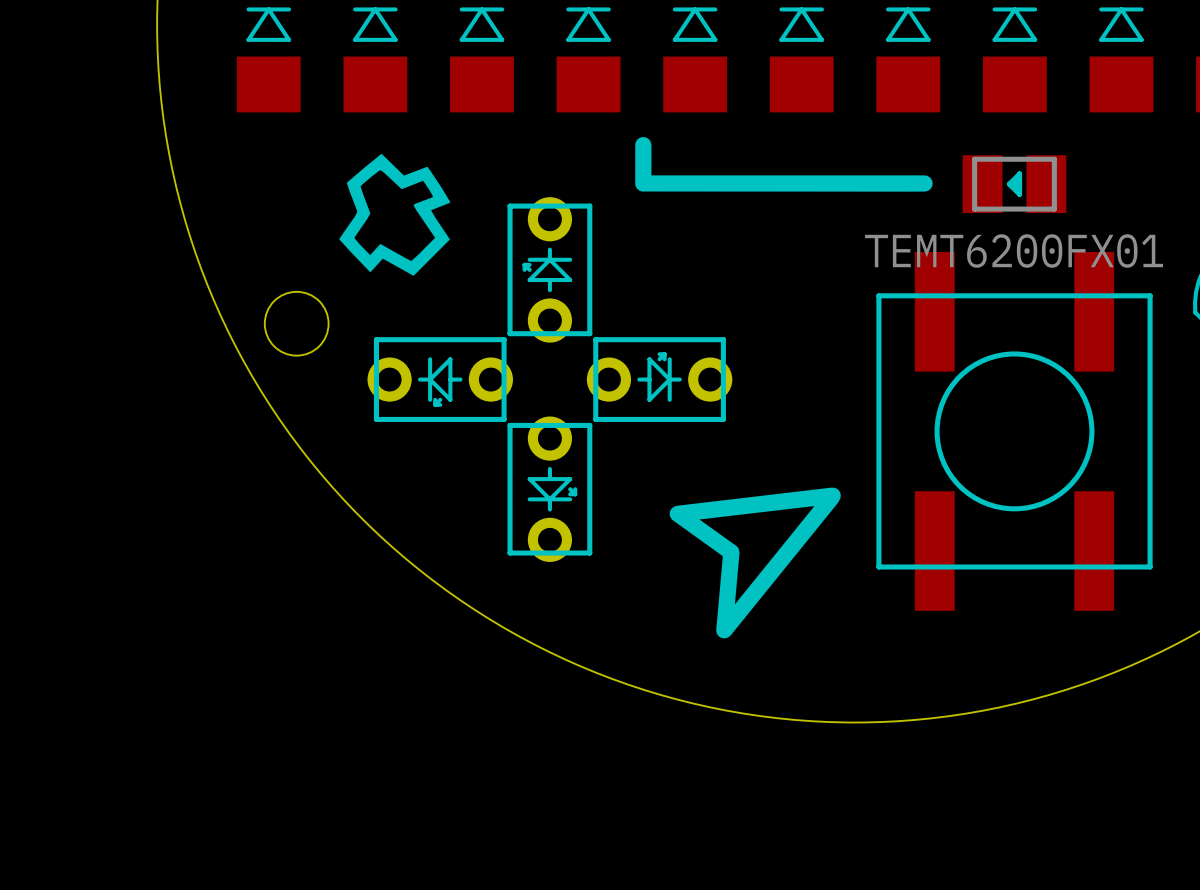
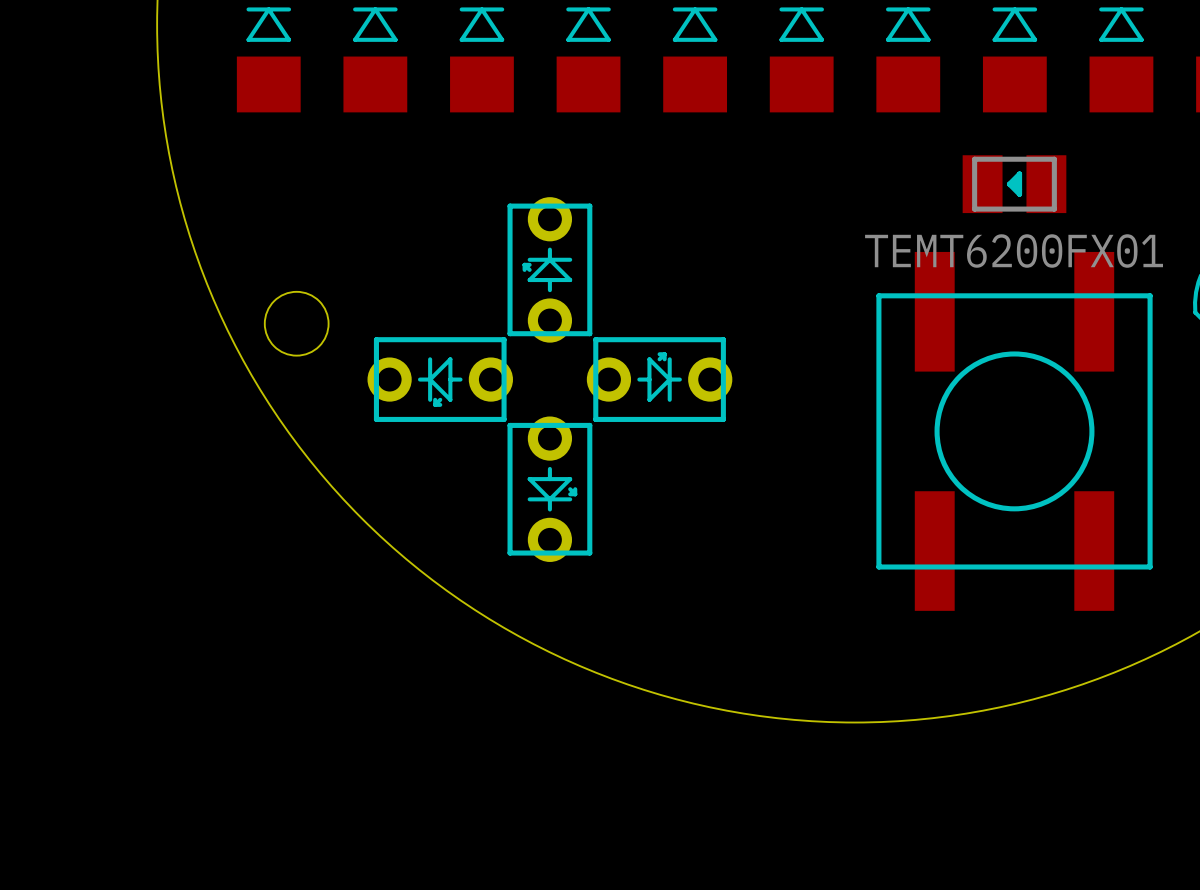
drawing: [635, 137, 933, 192] -> none
drawing: [339, 153, 451, 276] -> none
drawing: [669, 487, 841, 639] -> none

